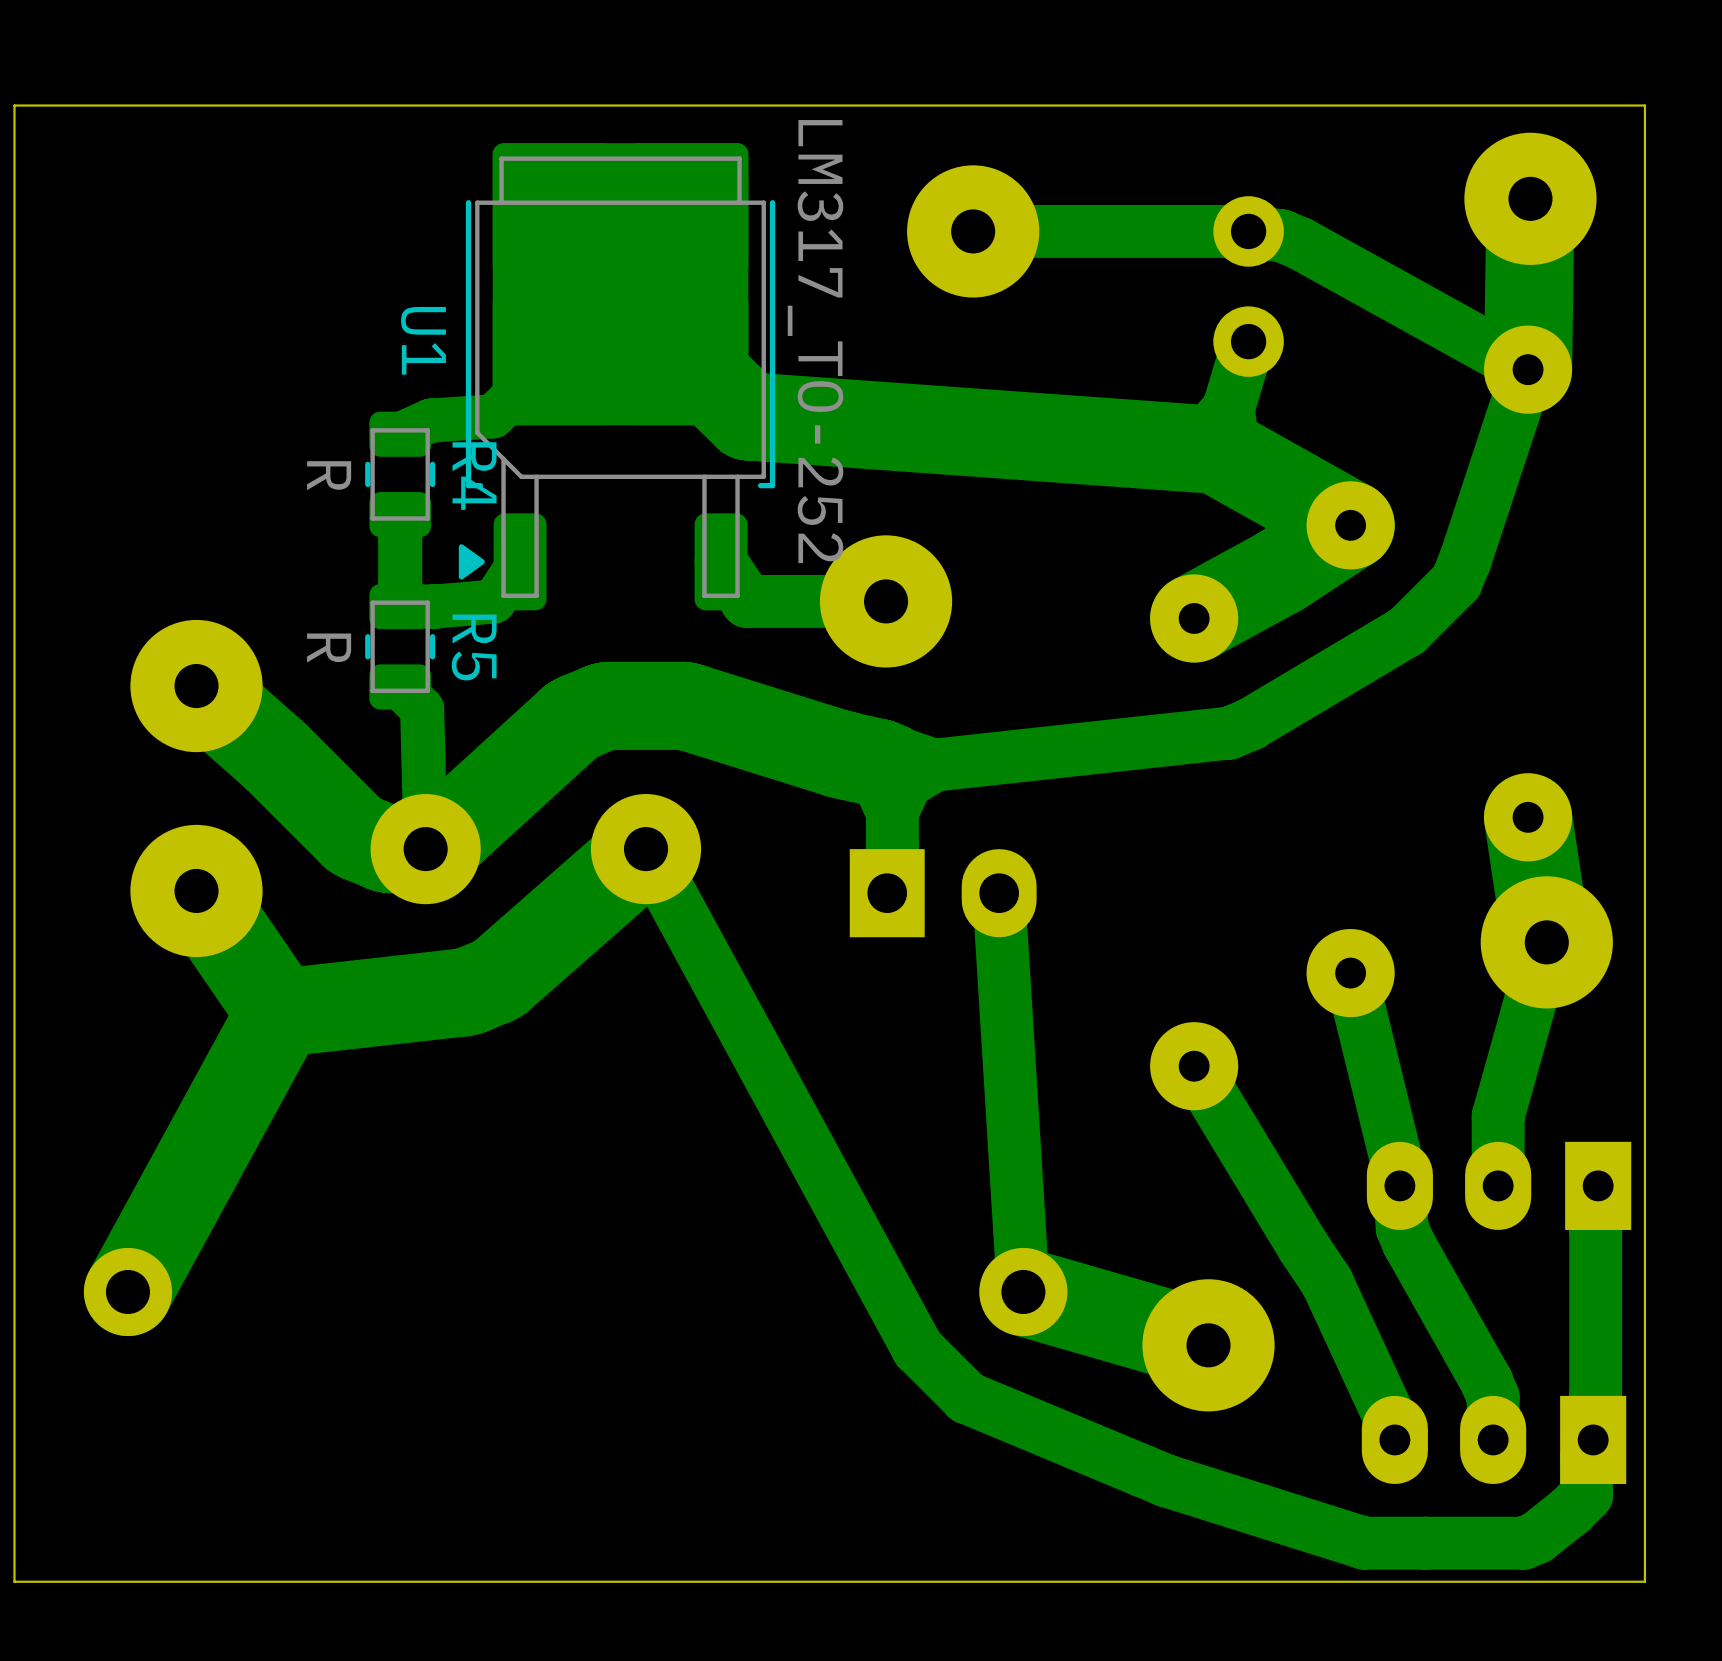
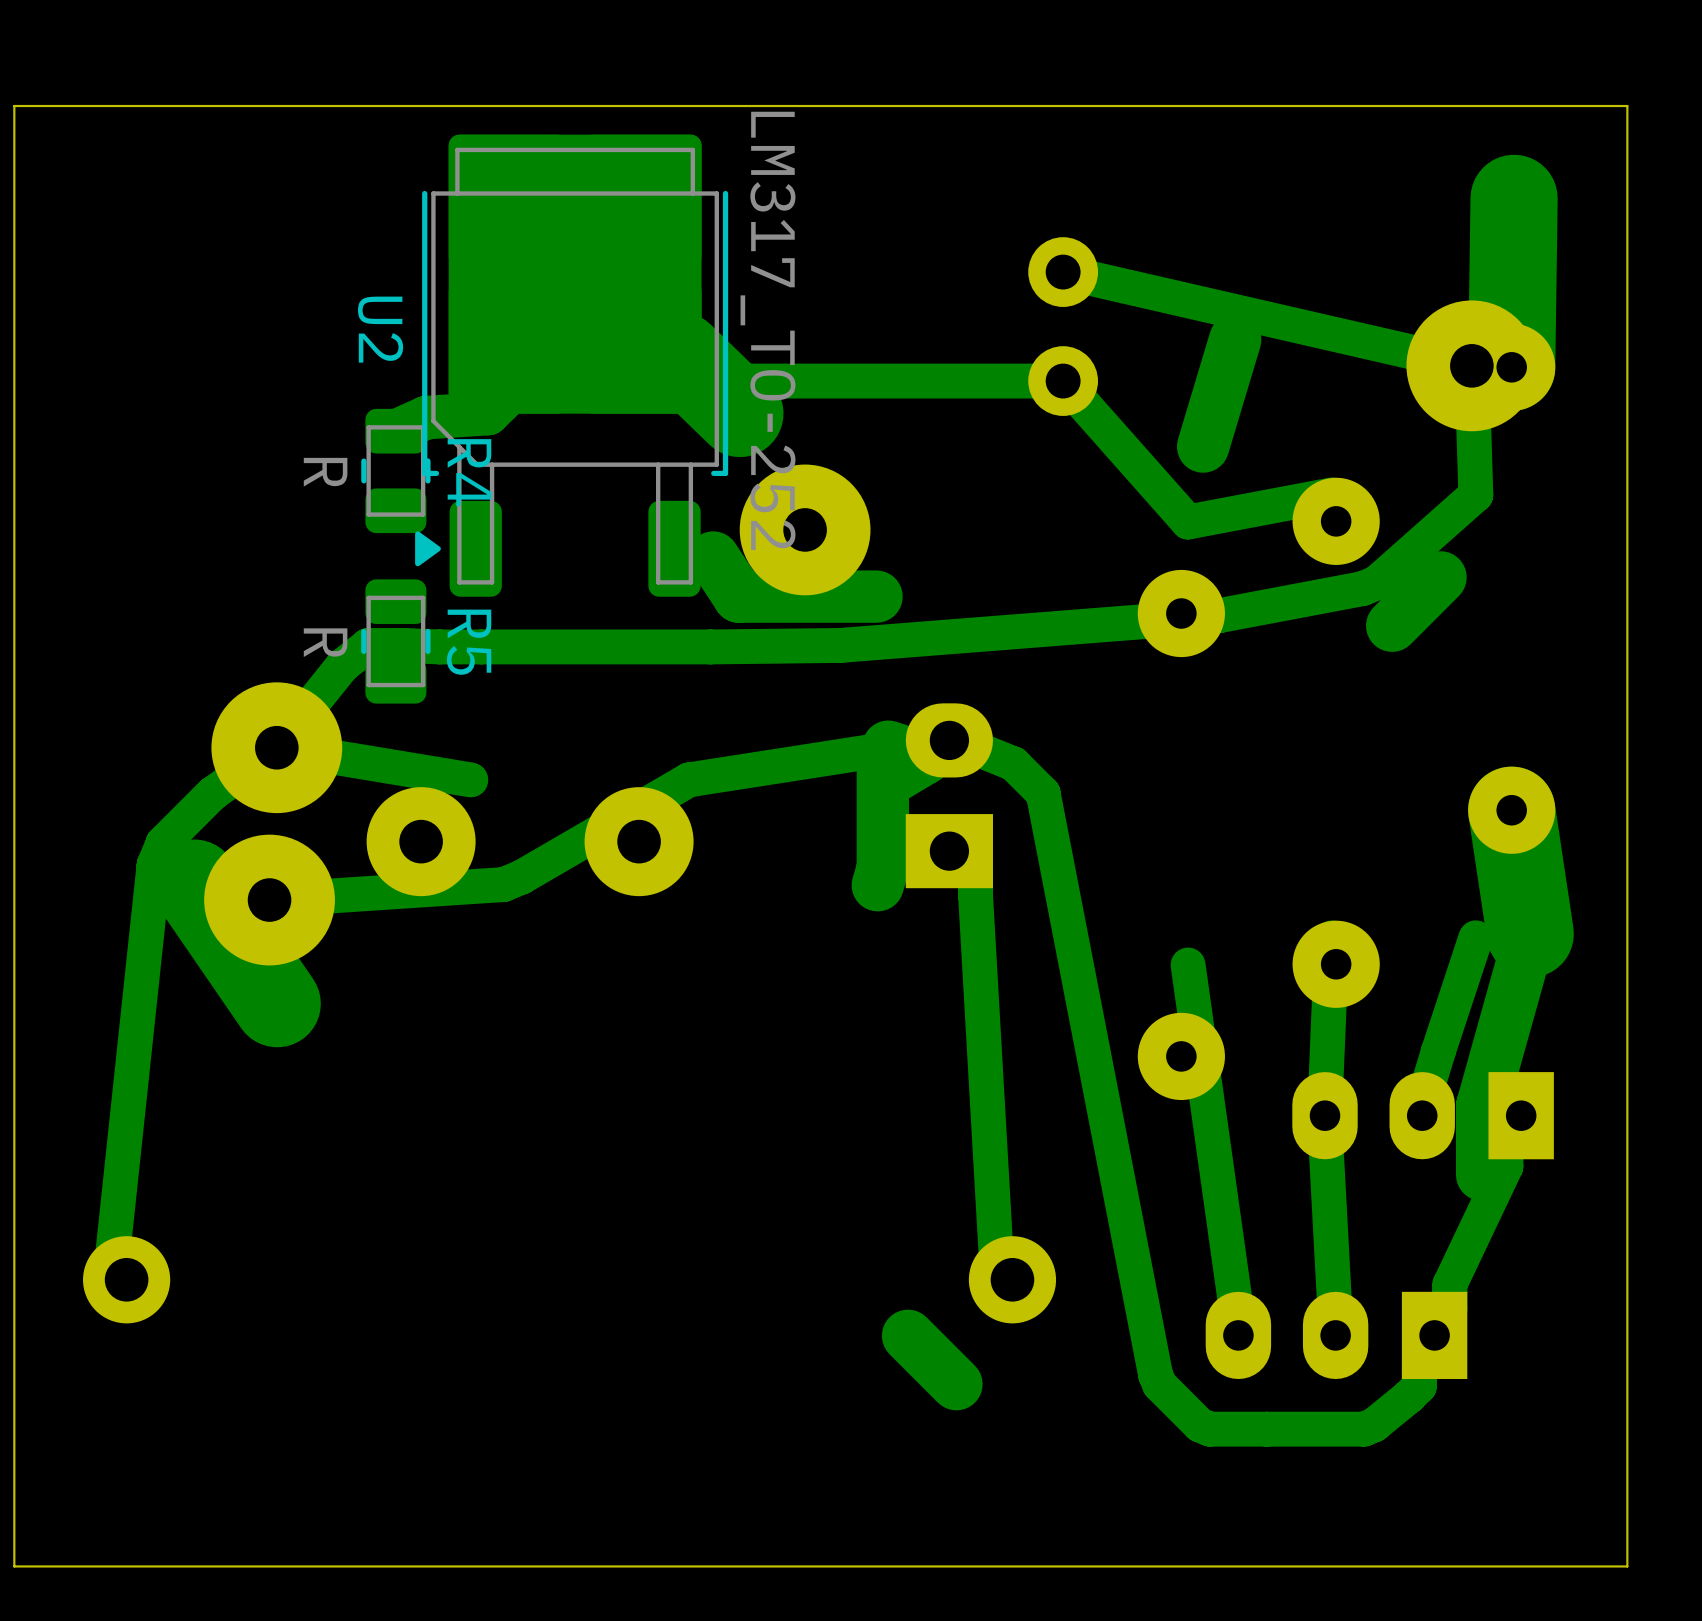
part position: (1530, 198) -> (1471, 365)
bottom track: (973, 231) (1248, 231) (1281, 235) (1300, 243) (1528, 369) (1465, 560) (1456, 581) -> none
part: (973, 231) -> none
bottom track: none -> (1063, 272) (1471, 365) (1475, 494) (1376, 582) (1362, 588) (1218, 615) (839, 645) (368, 645) (342, 665) (276, 747)
part position: (1248, 286) -> (1063, 326)
U1 name: U1 (423, 340) -> U2 (380, 329)
bottom track: none -> (641, 347) (684, 381) (1063, 381) (1188, 522) (1331, 494)
U1 position: (617, 376) -> (571, 365)
bottom track: (748, 416) (1216, 449) (1350, 525) (1280, 571) (1194, 618) -> none
bottom track: (400, 514) (400, 606) (435, 606) (494, 601) (520, 561) -> none
part position: (886, 601) -> (805, 529)
bottom track: (1406, 631) (1250, 724) (1229, 732) -> none
bottom track: (196, 686) (275, 756) (353, 834) (389, 849) (425, 849) -> none
part: (196, 686) -> none
bottom track: (400, 686) (422, 709) (425, 849) -> none
bottom track: (1228, 733) (892, 769) (879, 762) (838, 753) (684, 705) (607, 705) (571, 720) (449, 831) (425, 849) -> none
bottom track: none -> (276, 747) (212, 793) (163, 842) (154, 864) (111, 1269)
bottom track: none -> (276, 747) (470, 779)
part: none -> (276, 747)
bottom track: none -> (949, 851) (975, 870) (996, 1269)
part position: (196, 890) -> (269, 900)
part rotation: 0° (943, 893) -> 90° counterclockwise (949, 795)
bottom track: (999, 893) (1023, 1291) (1208, 1345) -> none
bottom track: none -> (269, 900) (503, 884) (521, 877) (688, 779) (942, 740) (955, 740) (1013, 763) (1043, 793) (1155, 1374) (1159, 1384) (1199, 1424) (1209, 1429) (1364, 1429) (1374, 1424) (1419, 1386) (1419, 1361) (1449, 1309) (1449, 1284) (1505, 1166) (1505, 1141) (1521, 1115)
part: (1546, 942) -> none
bottom track: none -> (1331, 937) (1325, 1126) (1335, 1335)
bottom track: none -> (1475, 937) (1422, 1104) (1422, 1115)
bottom track: none -> (1188, 964) (1238, 1335)
bottom track: (1350, 973) (1399, 1174) (1402, 1228) (1408, 1242) (1486, 1381) (1493, 1397) (1493, 1439) -> none
bottom track: (1194, 1066) (1303, 1247) (1327, 1282) (1394, 1428) (1394, 1439) -> none
part position: (1499, 1185) -> (1423, 1115)
bottom track: (1598, 1185) (1595, 1203) (1595, 1422) (1593, 1439) (1586, 1457) (1586, 1494) (1571, 1510) (1536, 1537) (1523, 1543) (1364, 1543) (1166, 1480) (967, 1397) -> none
bottom track: (127, 1291) (280, 1012) (464, 992) (494, 980) (646, 849) (917, 1348) -> none
part: (1208, 1345) -> none
part: none -> (1336, 1335)
part: (1494, 1439) -> none

